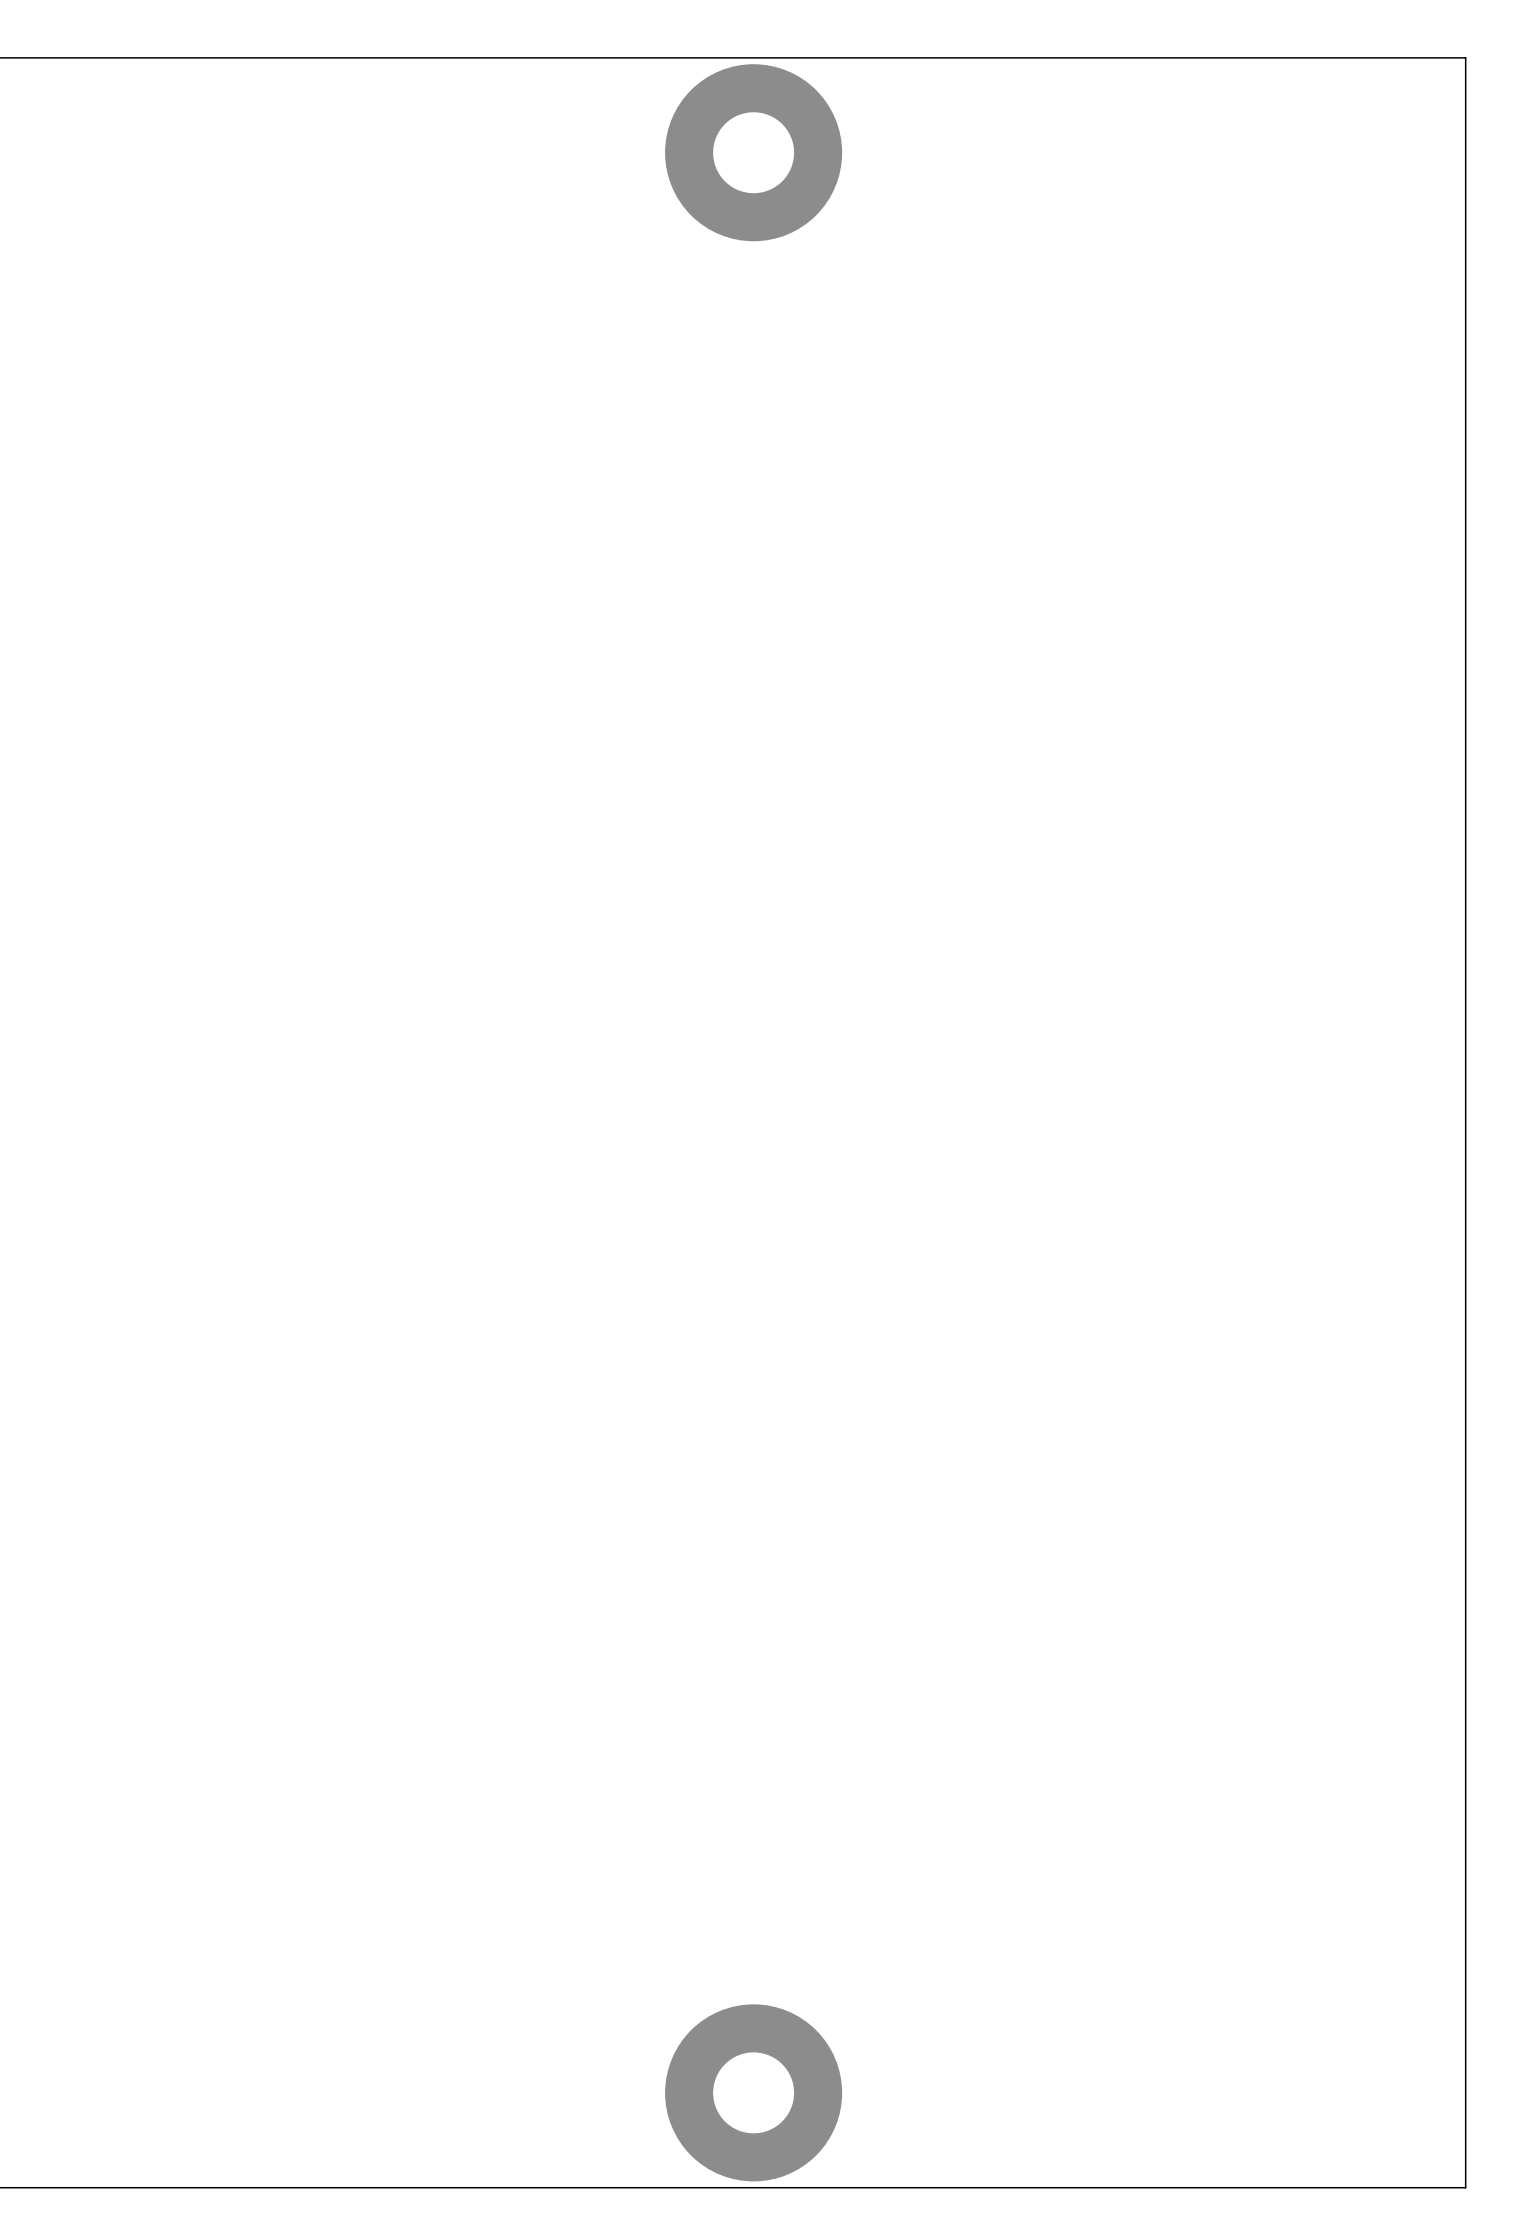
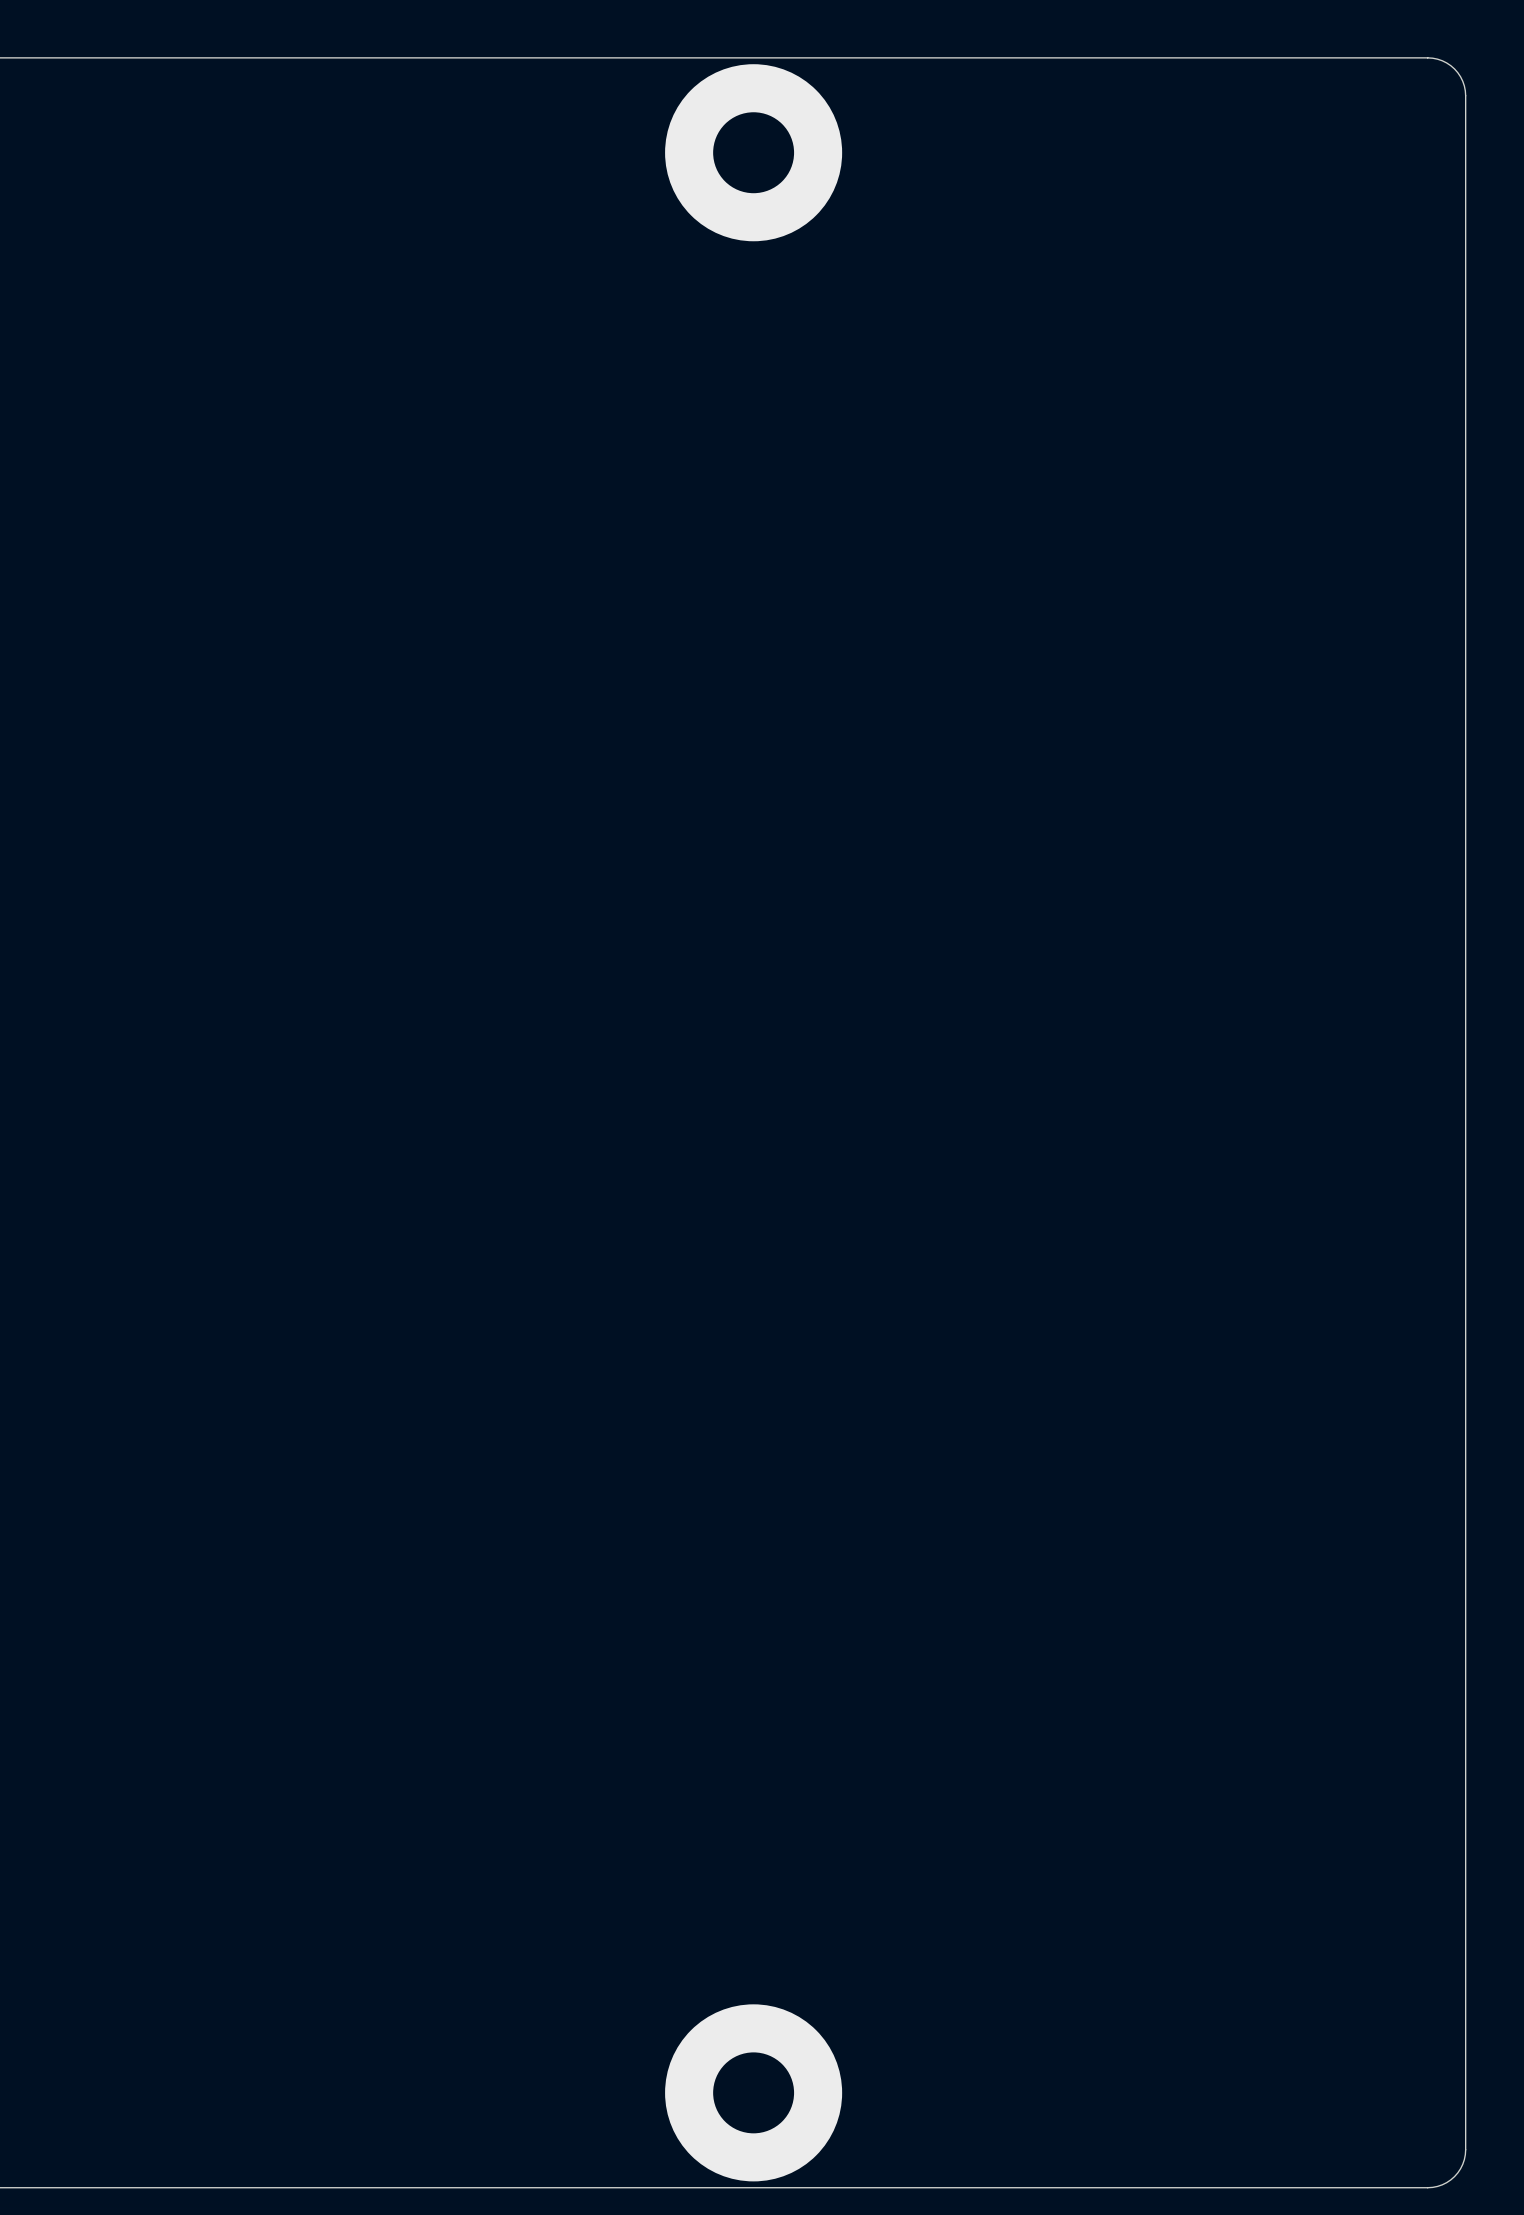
board edge: (1427, 57) (1465, 57) (1465, 95) -> (1427, 57) (1442, 60) (1454, 68) (1462, 81) (1465, 95)
board edge: (1465, 2149) (1465, 2187) (1427, 2187) -> (1465, 2149) (1462, 2164) (1454, 2176) (1442, 2184) (1427, 2187)

